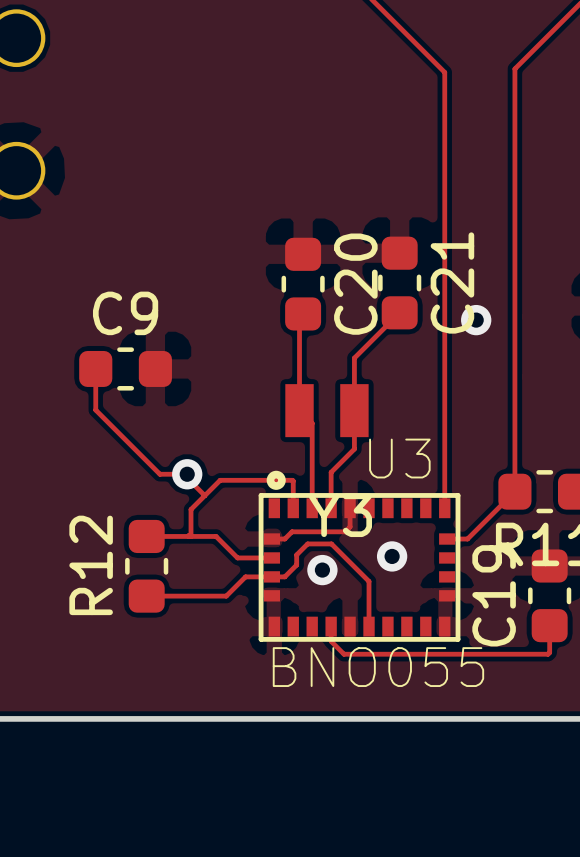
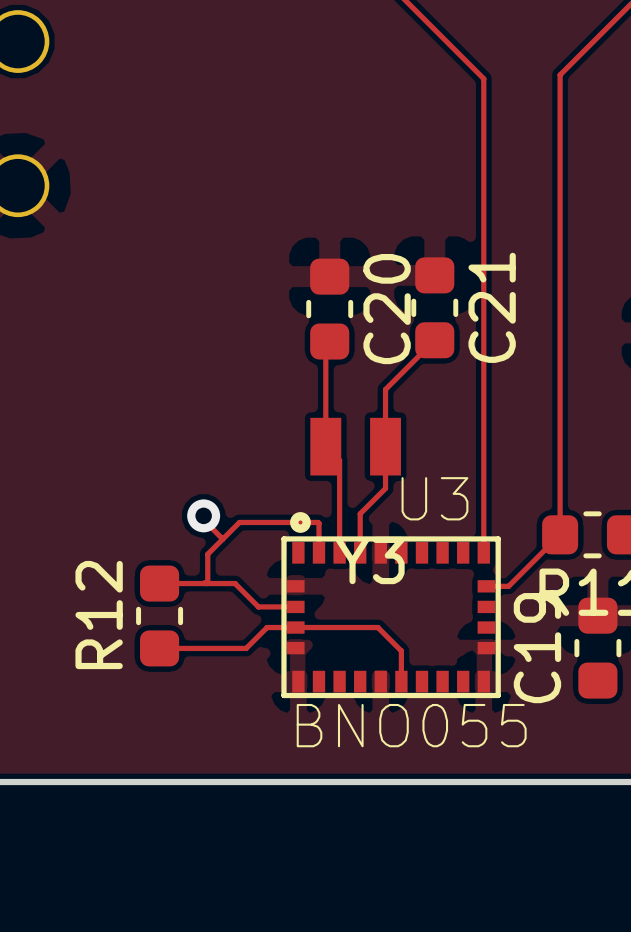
via: (476, 320) -> none
track: (95, 368) (95, 410) (159, 474) (187, 474) -> none
C9: (125, 368) -> none
track: (350, 508) (350, 526) (345, 531) (292, 531) (284, 539) (271, 539) -> none
via: (392, 556) -> none
via: (322, 570) -> none
track: (284, 576) (296, 565) (296, 554) (307, 543) (331, 543) (369, 581) (369, 598) -> (309, 627) (377, 627) (401, 651)
track: (549, 625) (548, 654) (344, 654) (331, 641) (331, 626) -> none

